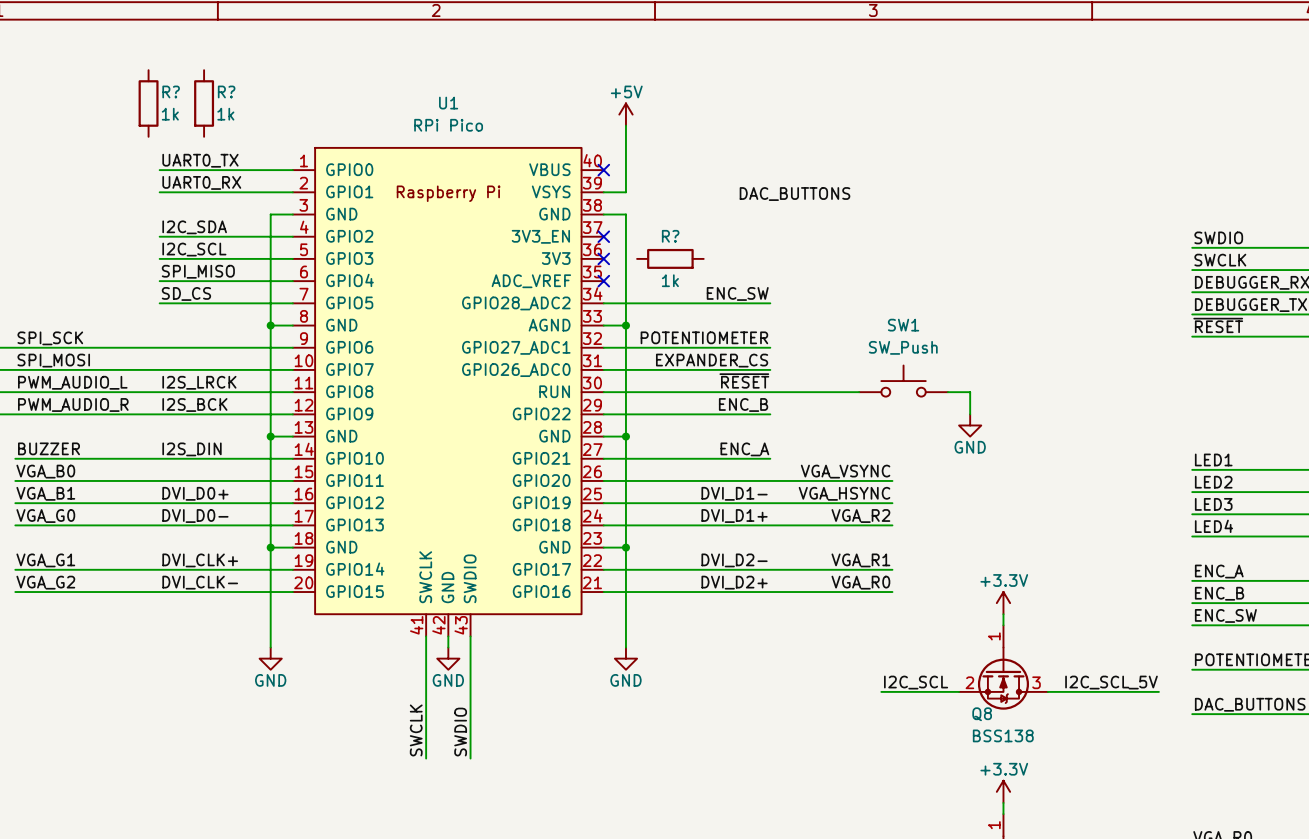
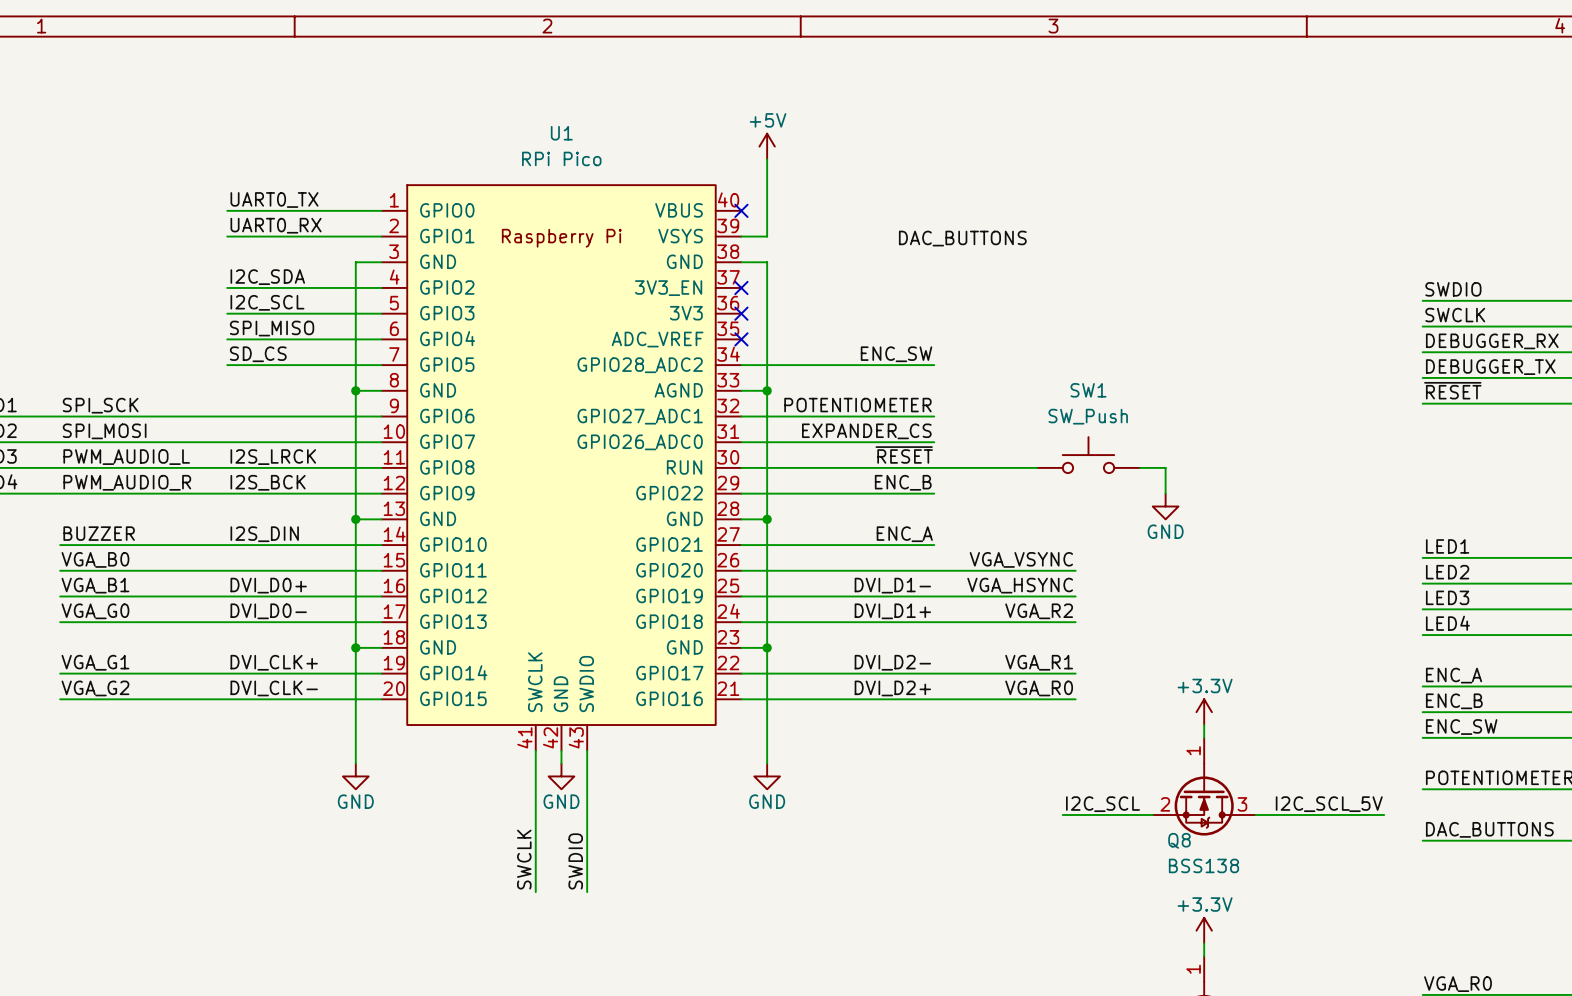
R?: 1k (148, 103) -> none
R?: 1k (204, 103) -> none
R?: 1k (670, 258) -> none

